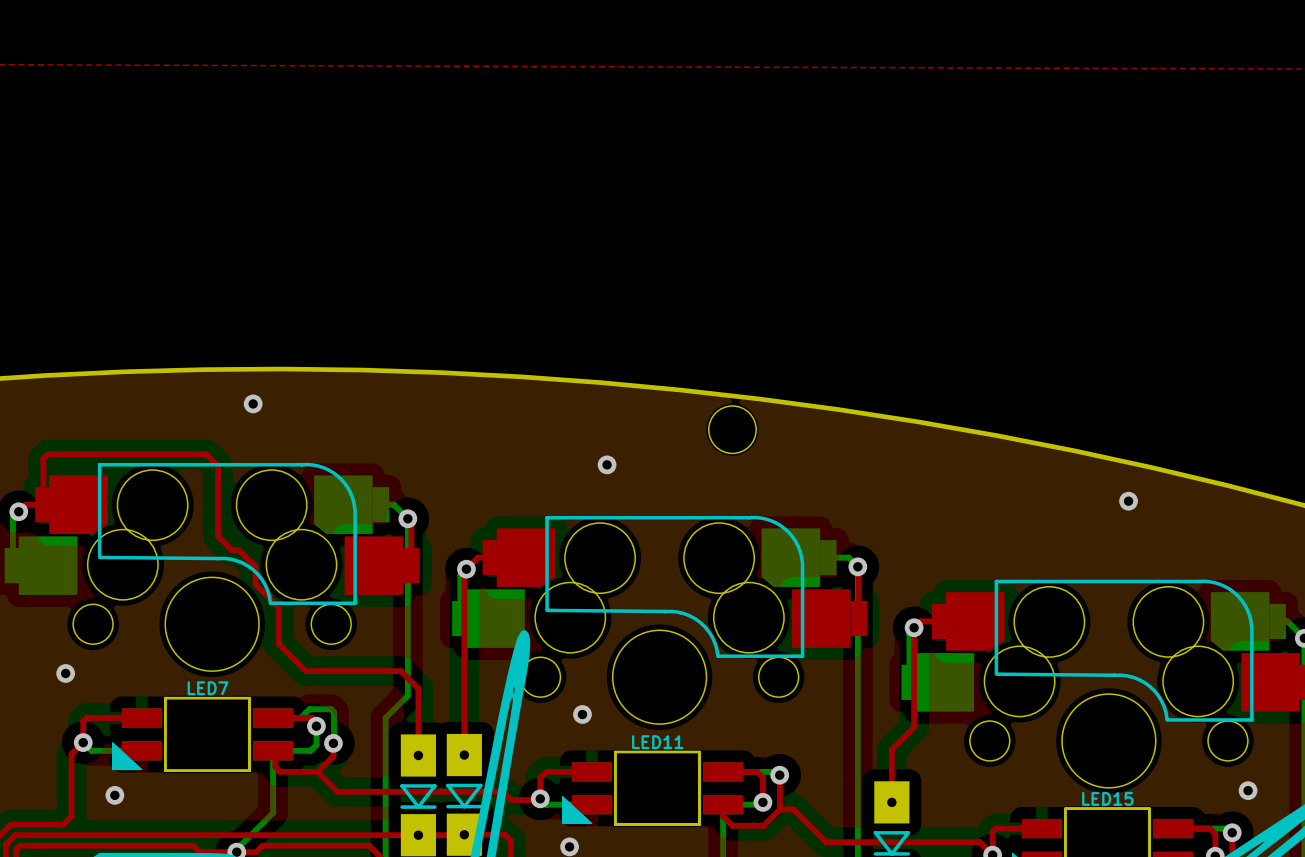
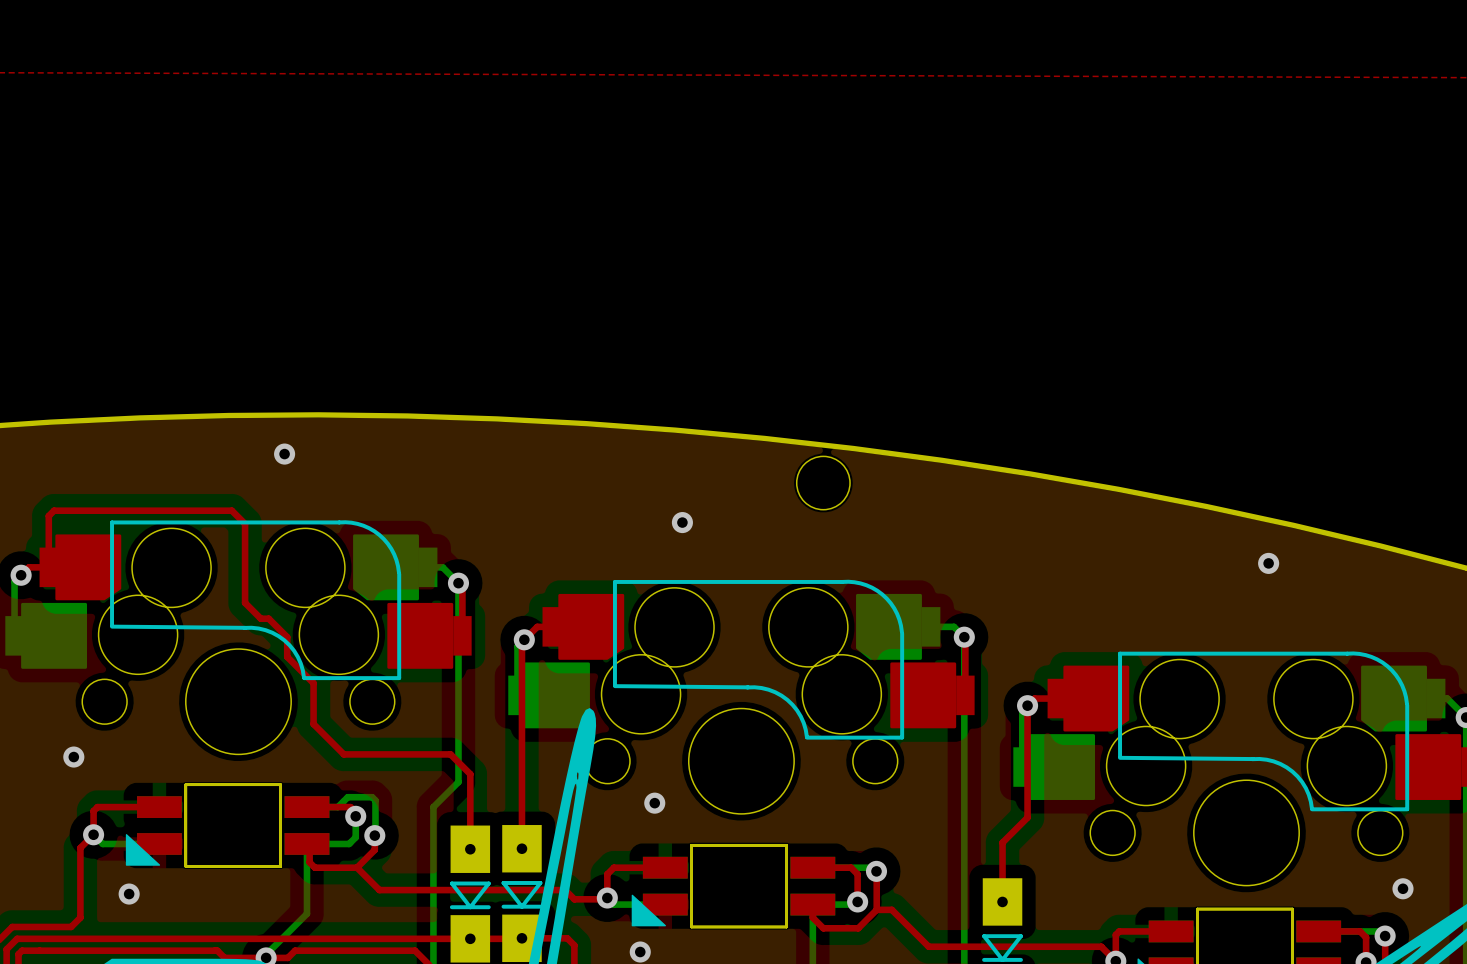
LED7 name: LED7 (208, 688) -> none
LED11 name: LED11 (657, 742) -> none
LED15 name: LED15 (1107, 798) -> none

